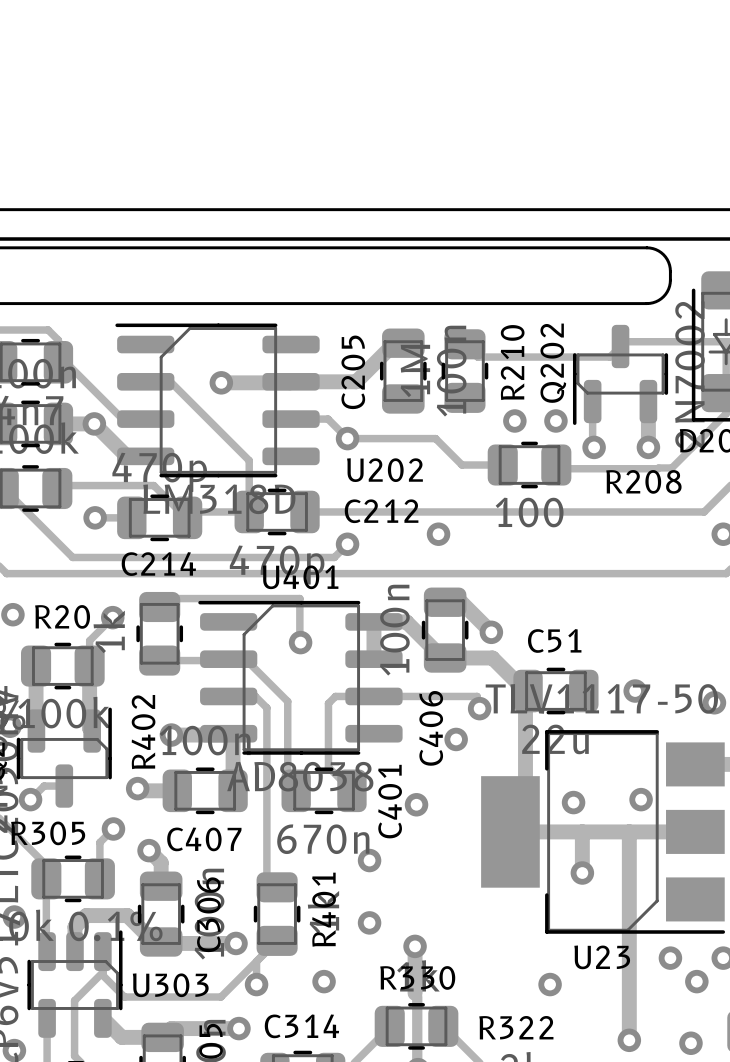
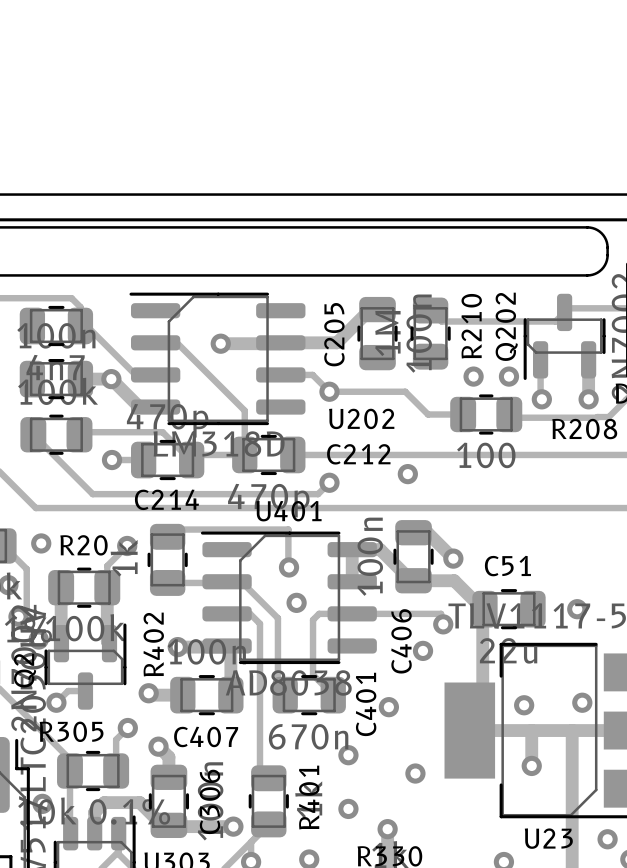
via: none -> (296, 602)
via: none -> (415, 773)

